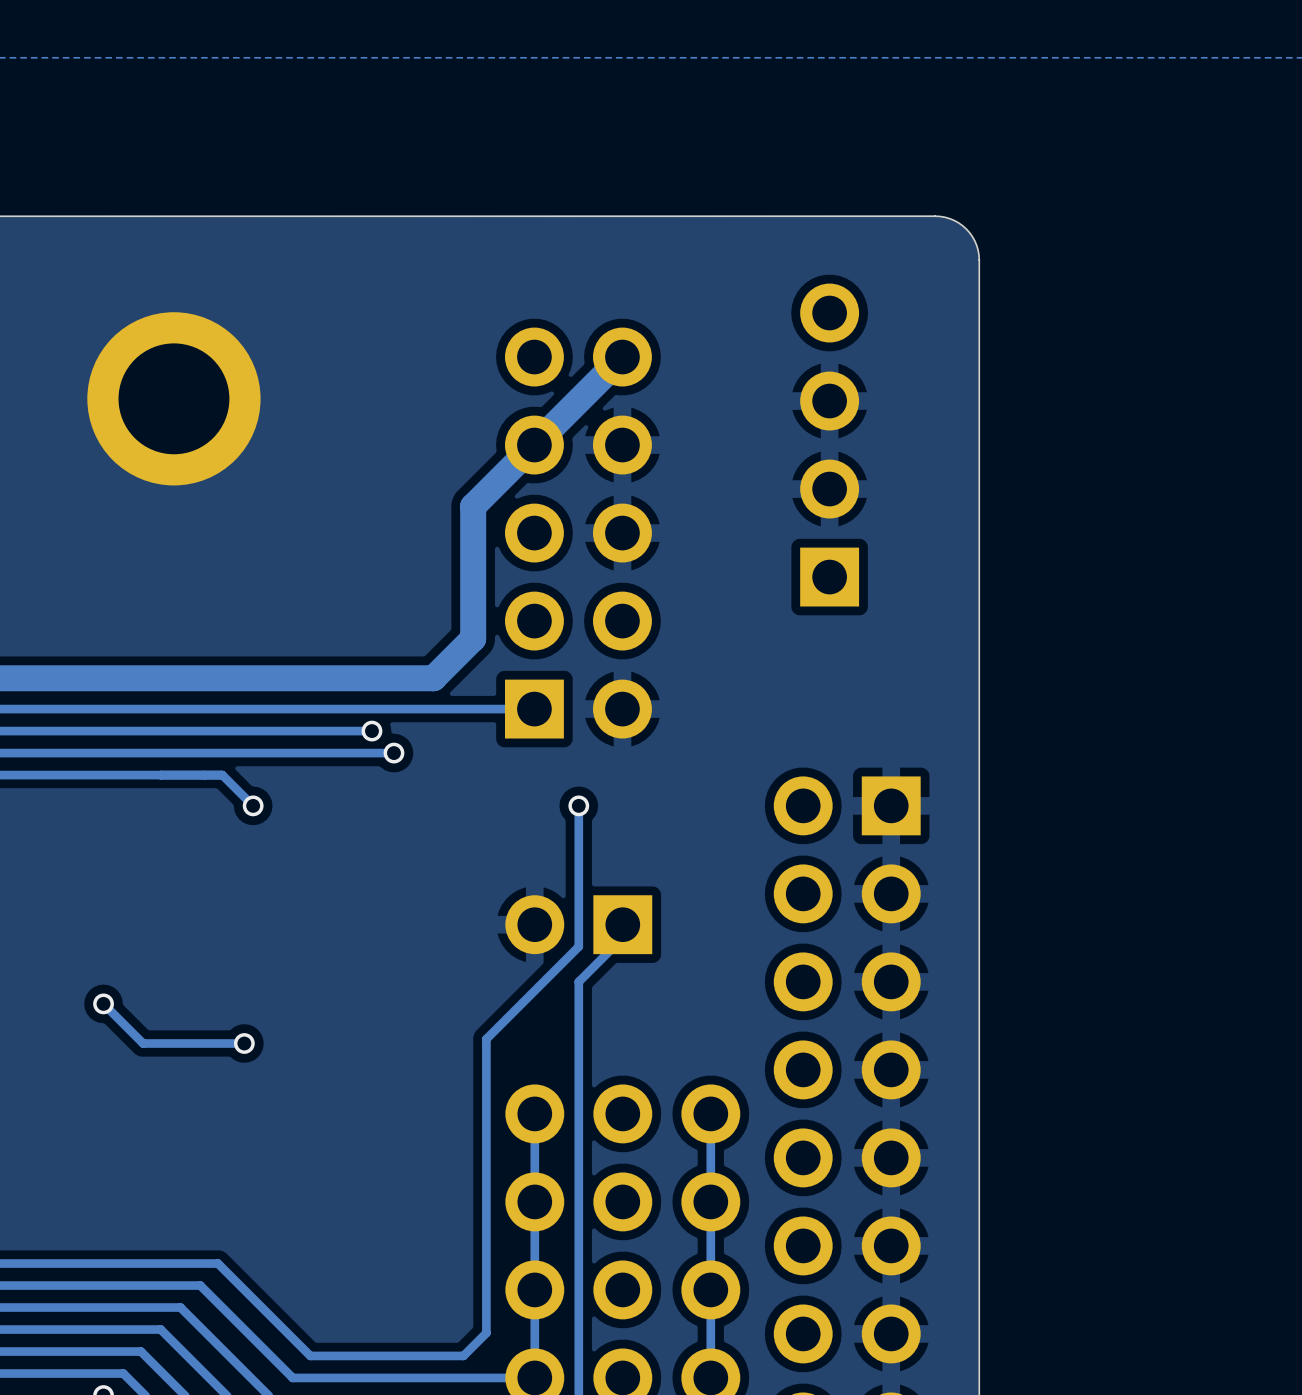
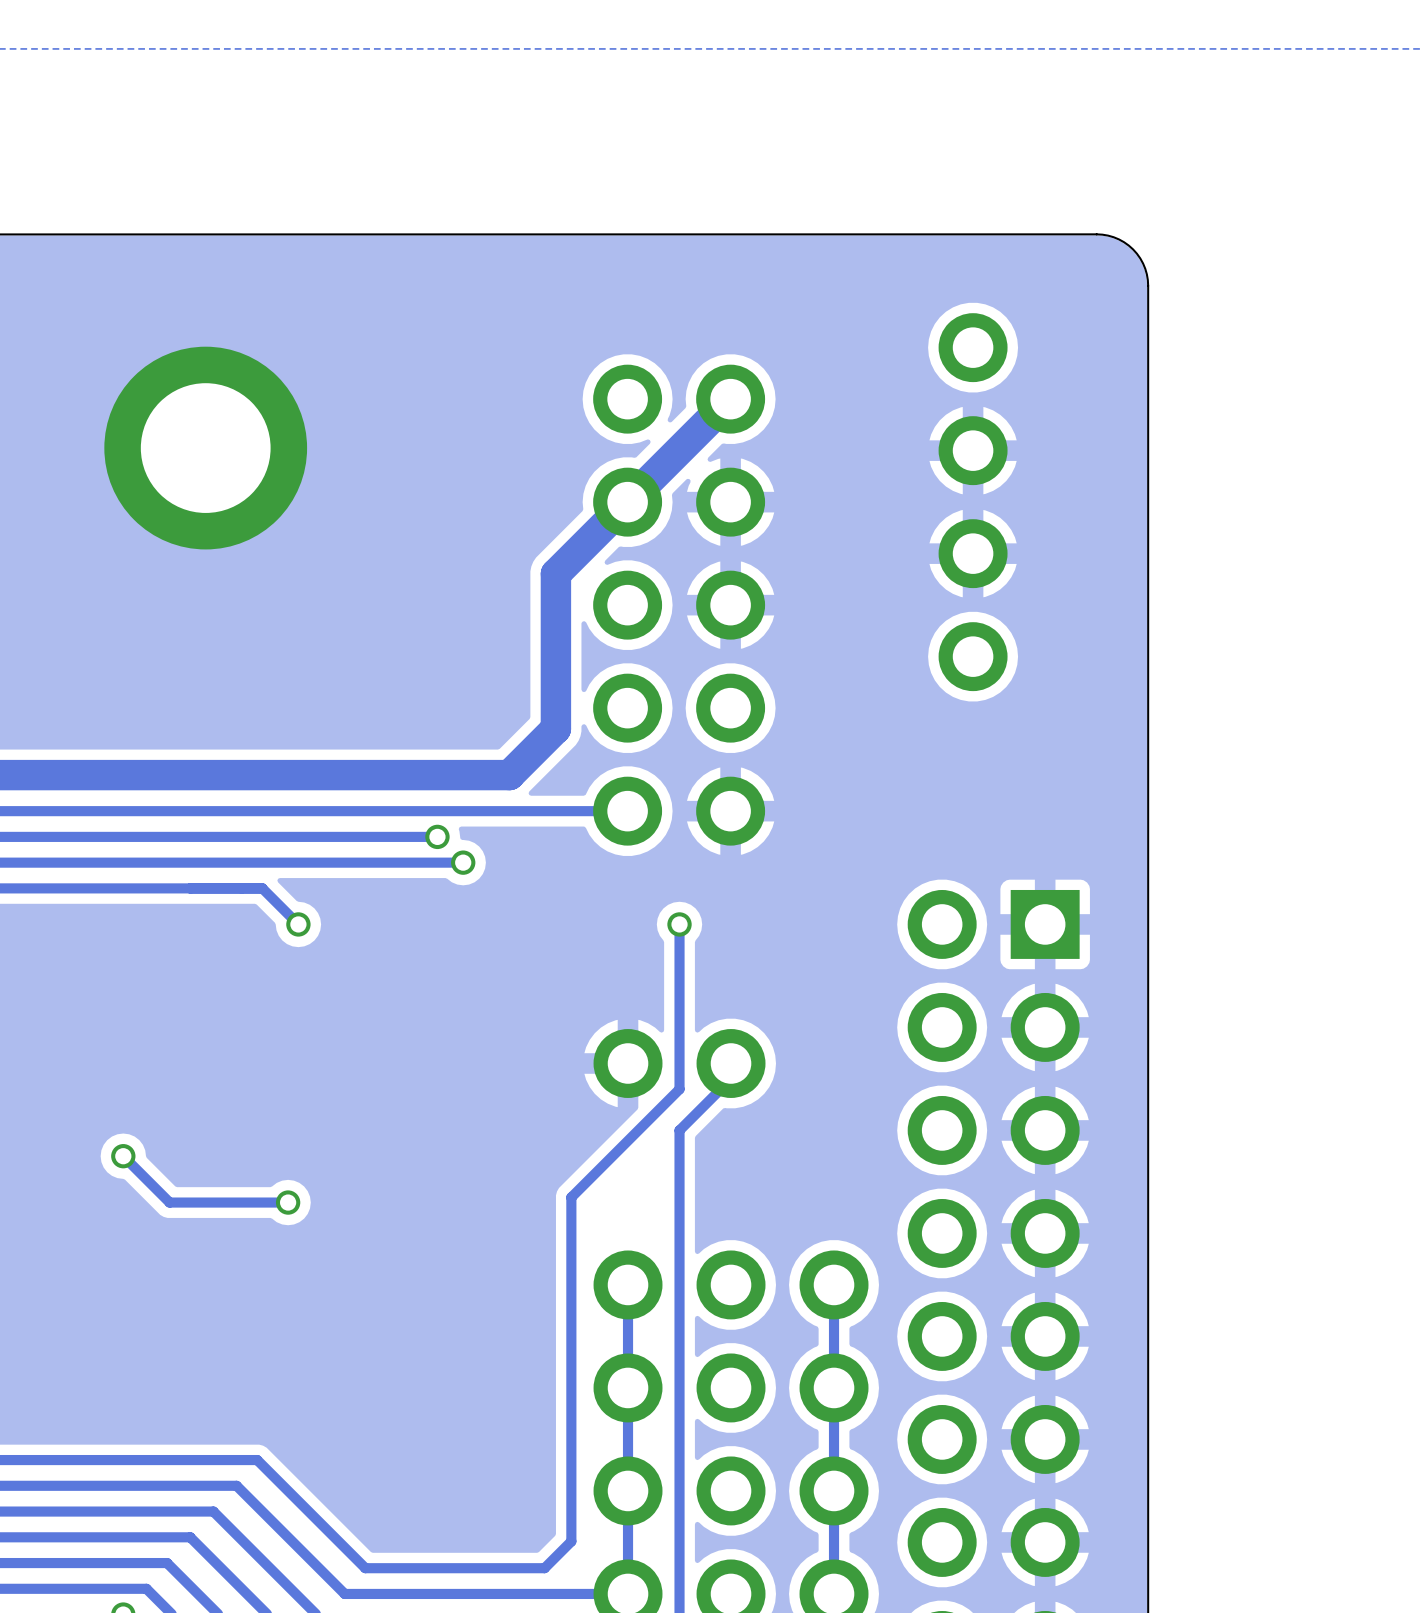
part footprint: [800, 283, 860, 607] -> [938, 313, 1008, 692]
part footprint: [504, 327, 652, 739] -> [593, 364, 766, 846]
part footprint: [505, 895, 653, 955] -> [593, 1029, 766, 1098]

